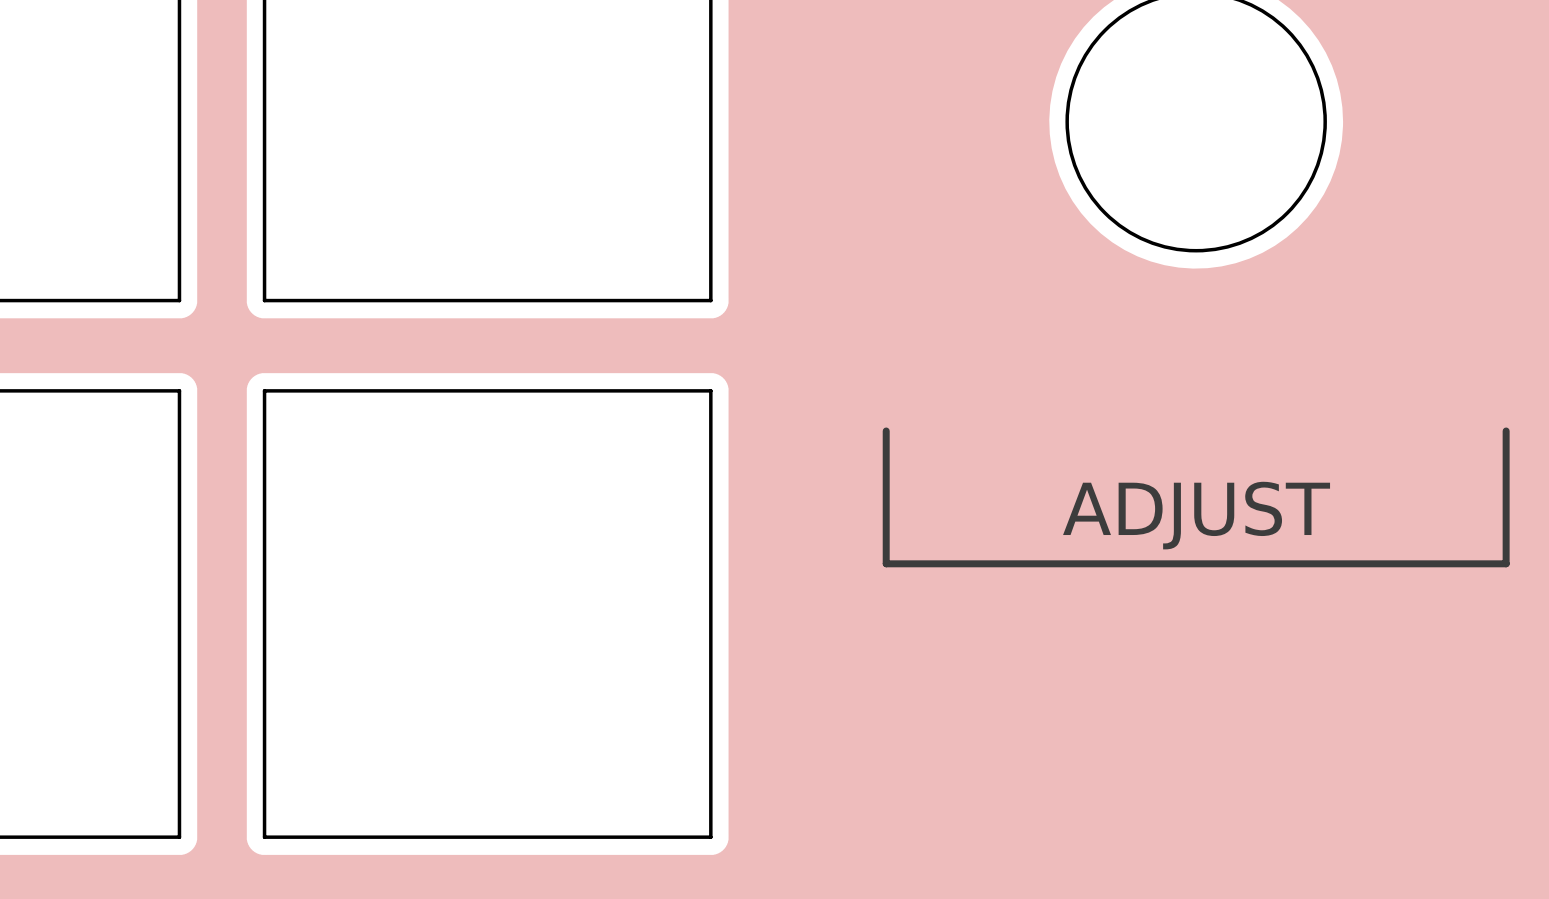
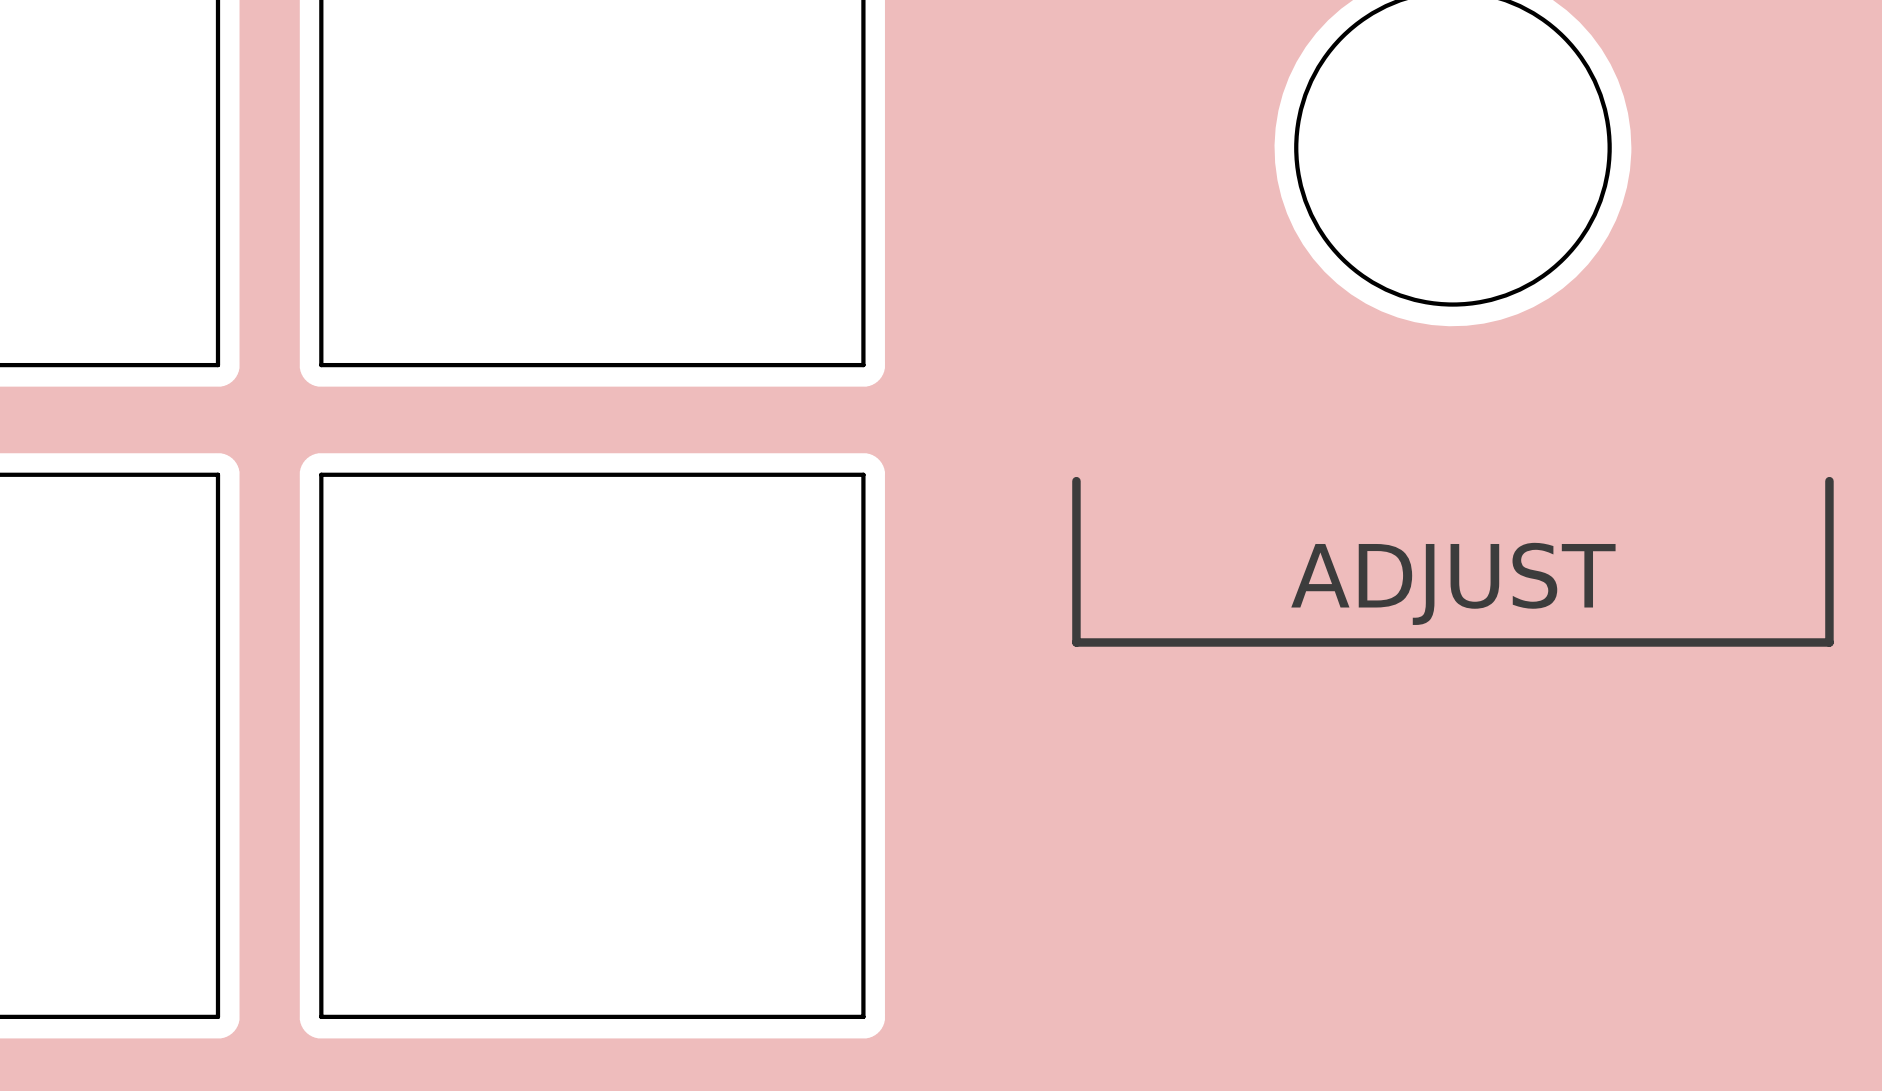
line: none -> (1076, 481) (1076, 523)
line: none -> (1829, 481) (1829, 523)
text position: ADJUST (1196, 515) -> ADJUST (1453, 583)
line: (886, 528) (886, 563) (1506, 563) (1506, 528) -> (1076, 642) (1829, 642)

